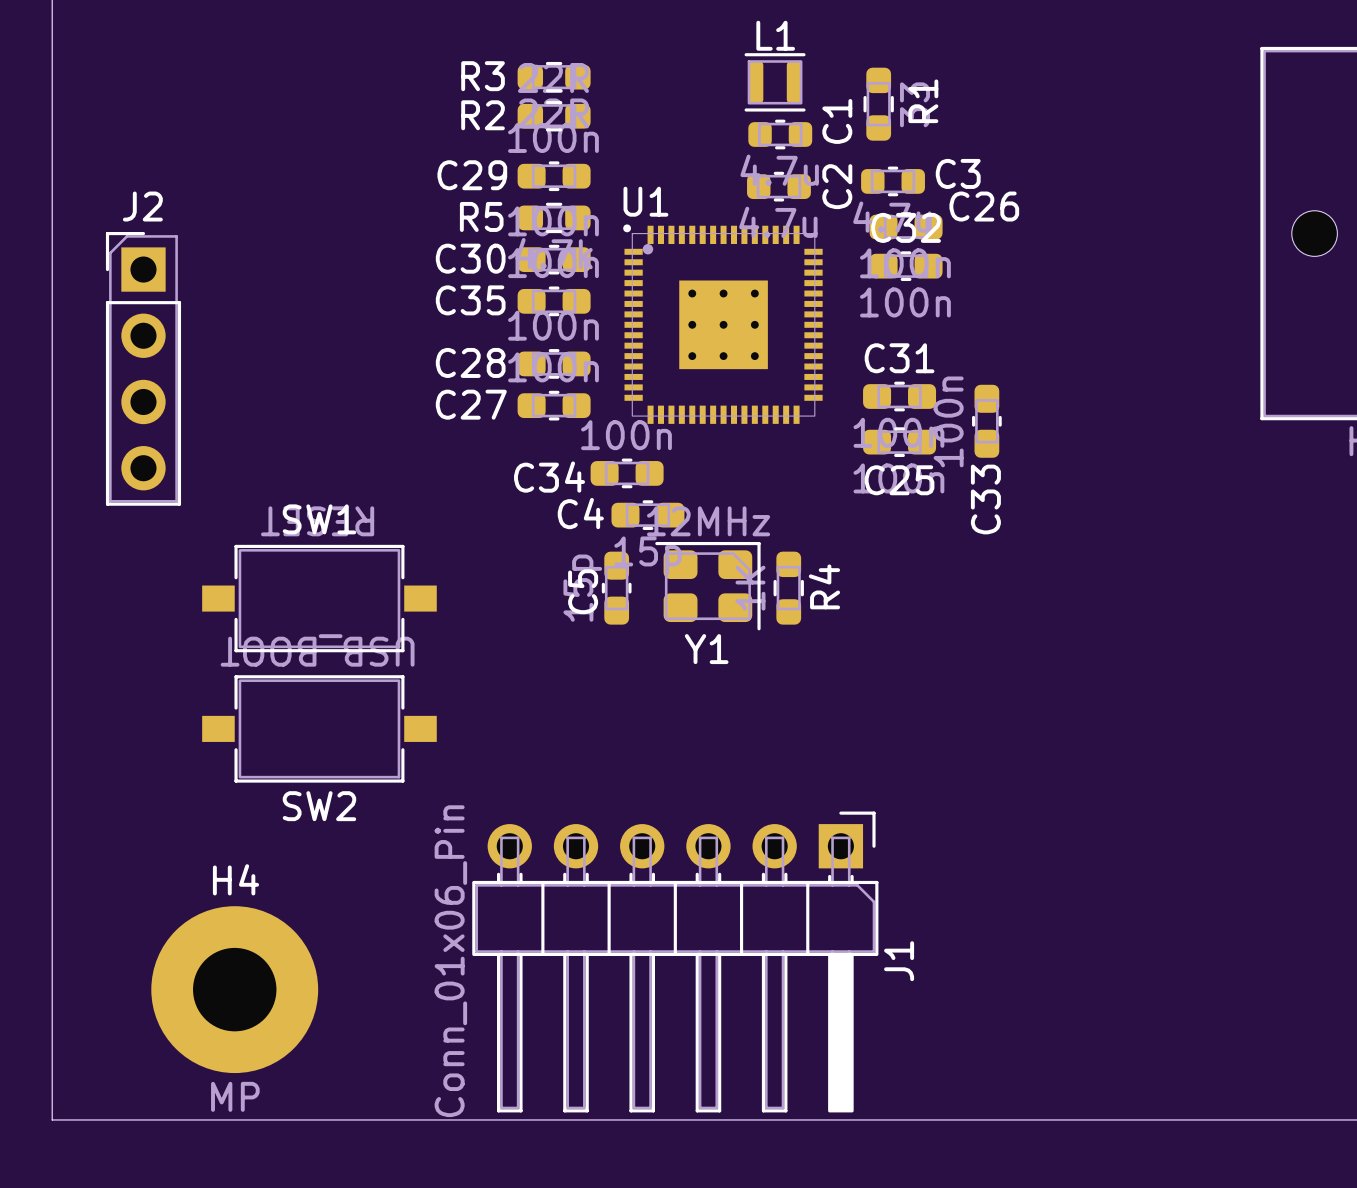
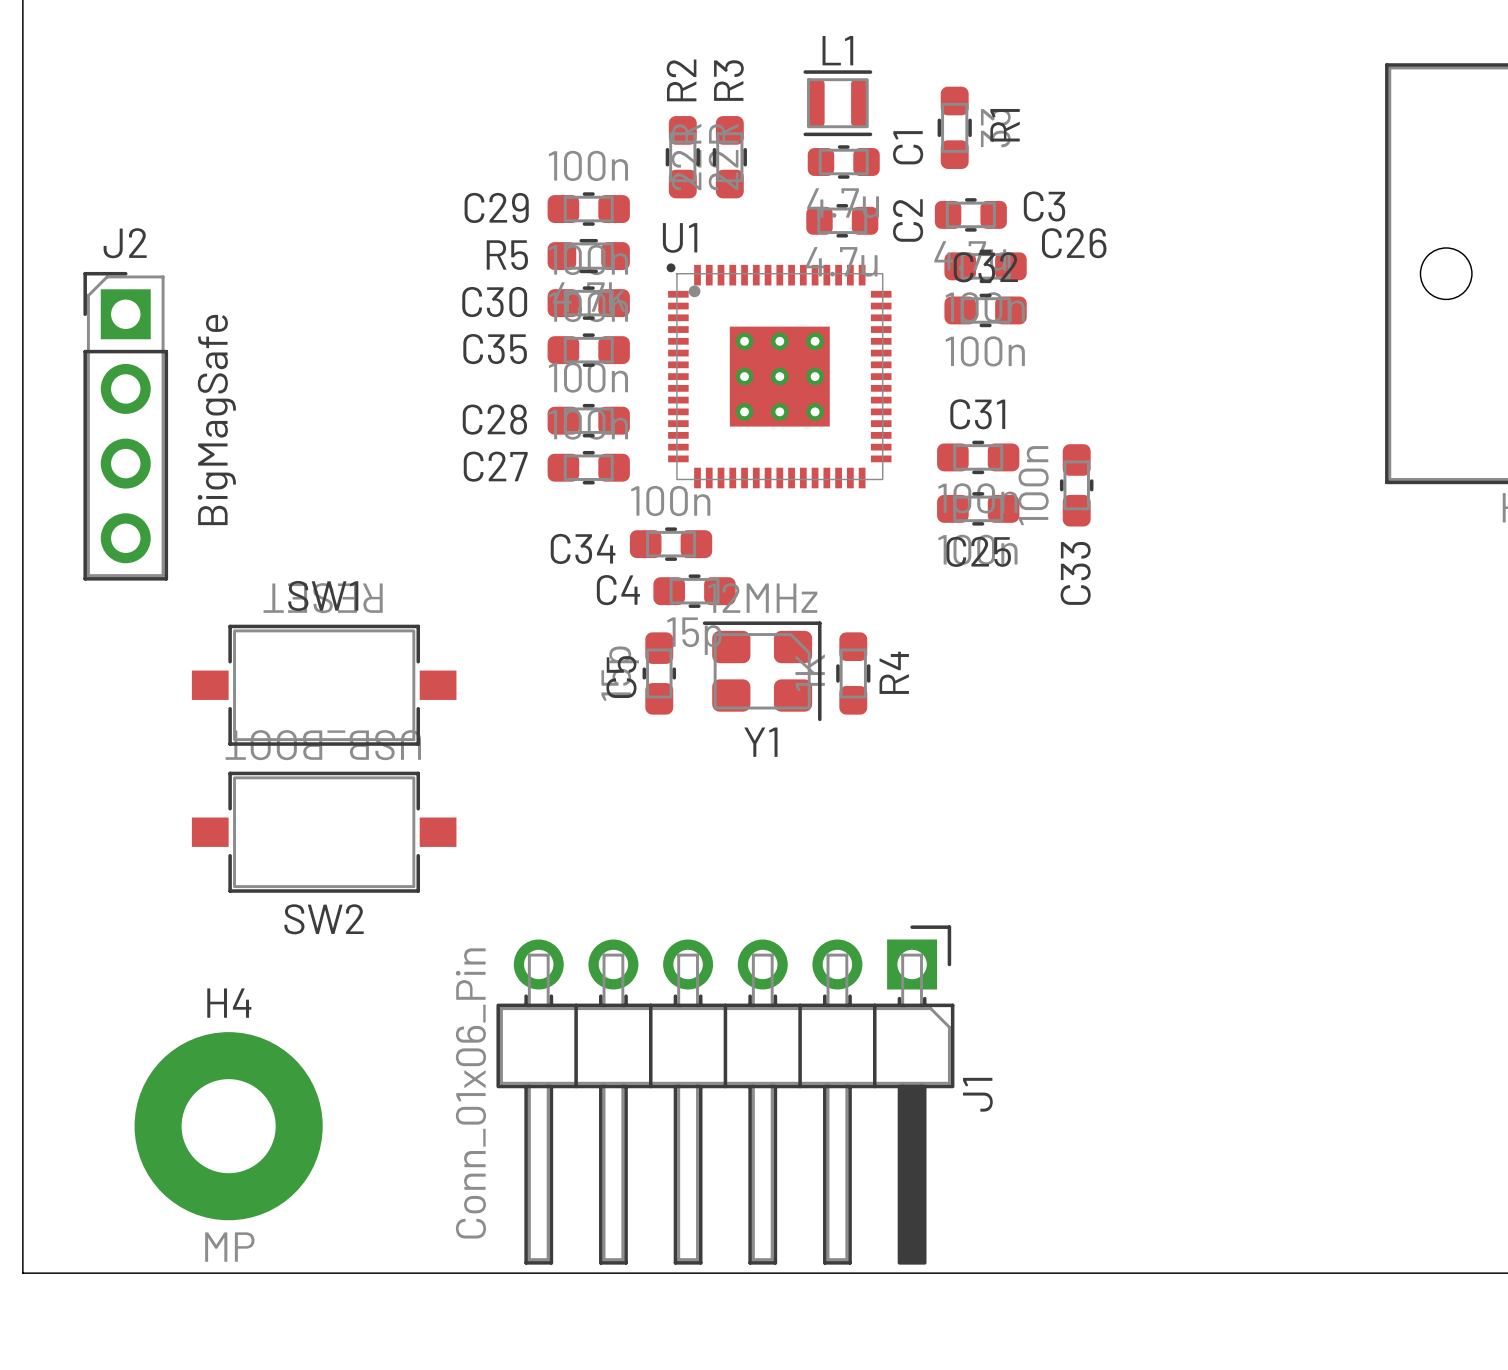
R3 rotation: 0° (554, 77) -> 90° clockwise (729, 157)
R3 position: (554, 77) -> (729, 157)
R2 rotation: 0° (554, 116) -> 90° clockwise (682, 157)
R2 position: (554, 116) -> (682, 157)
J2 text: none -> BigMagSafe (216, 419)

